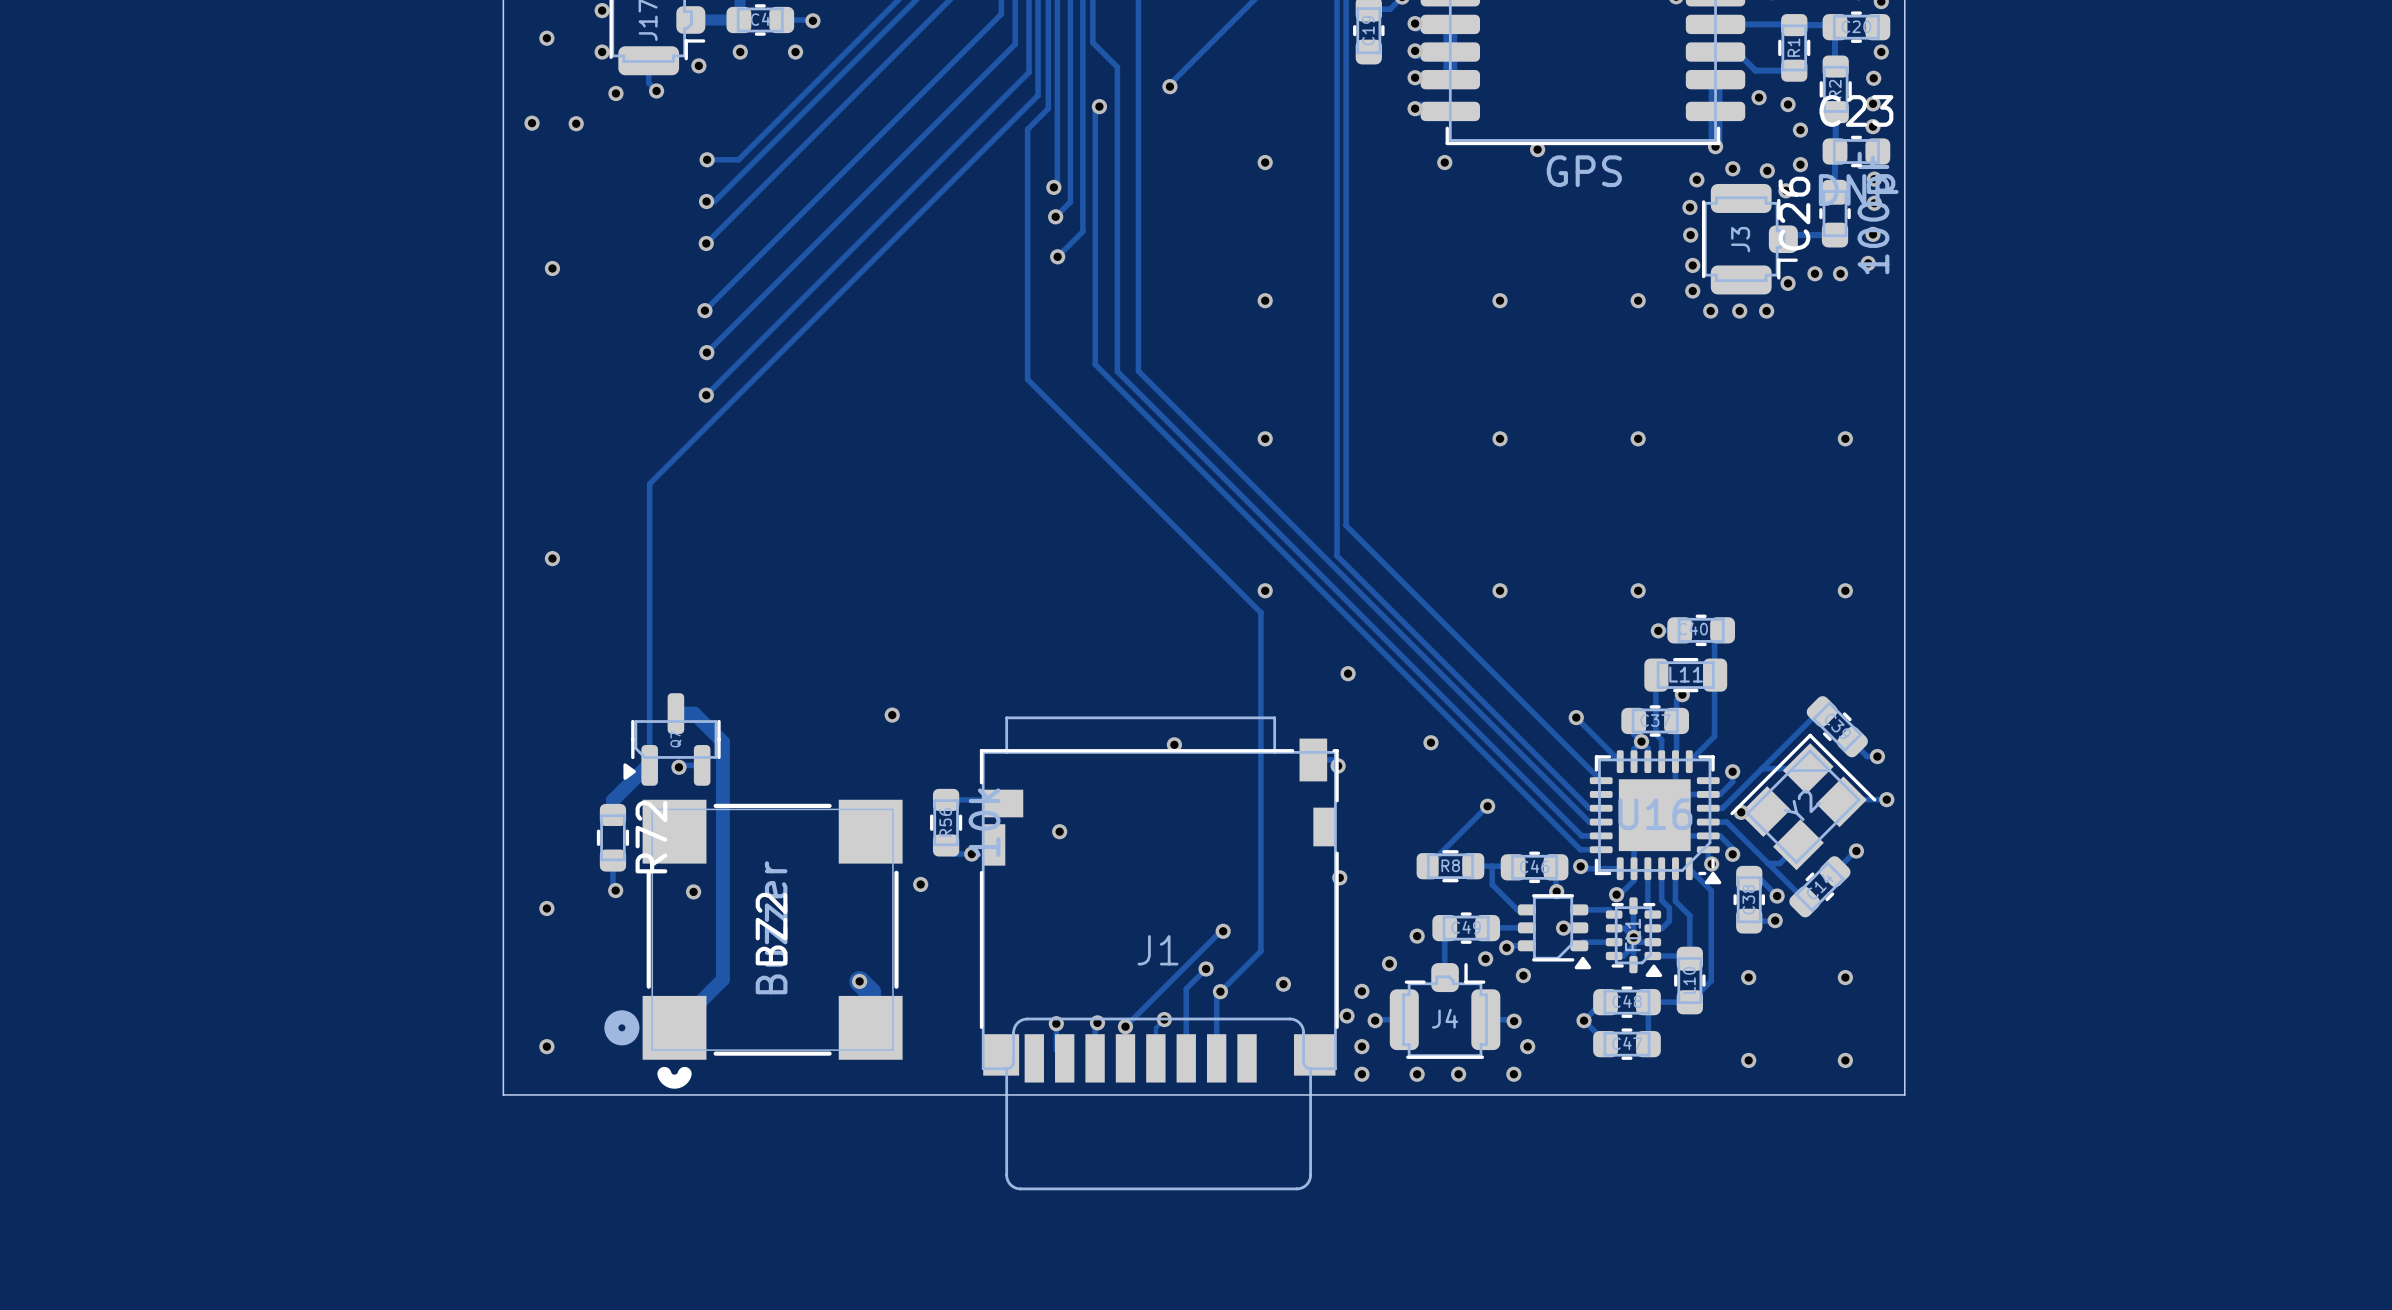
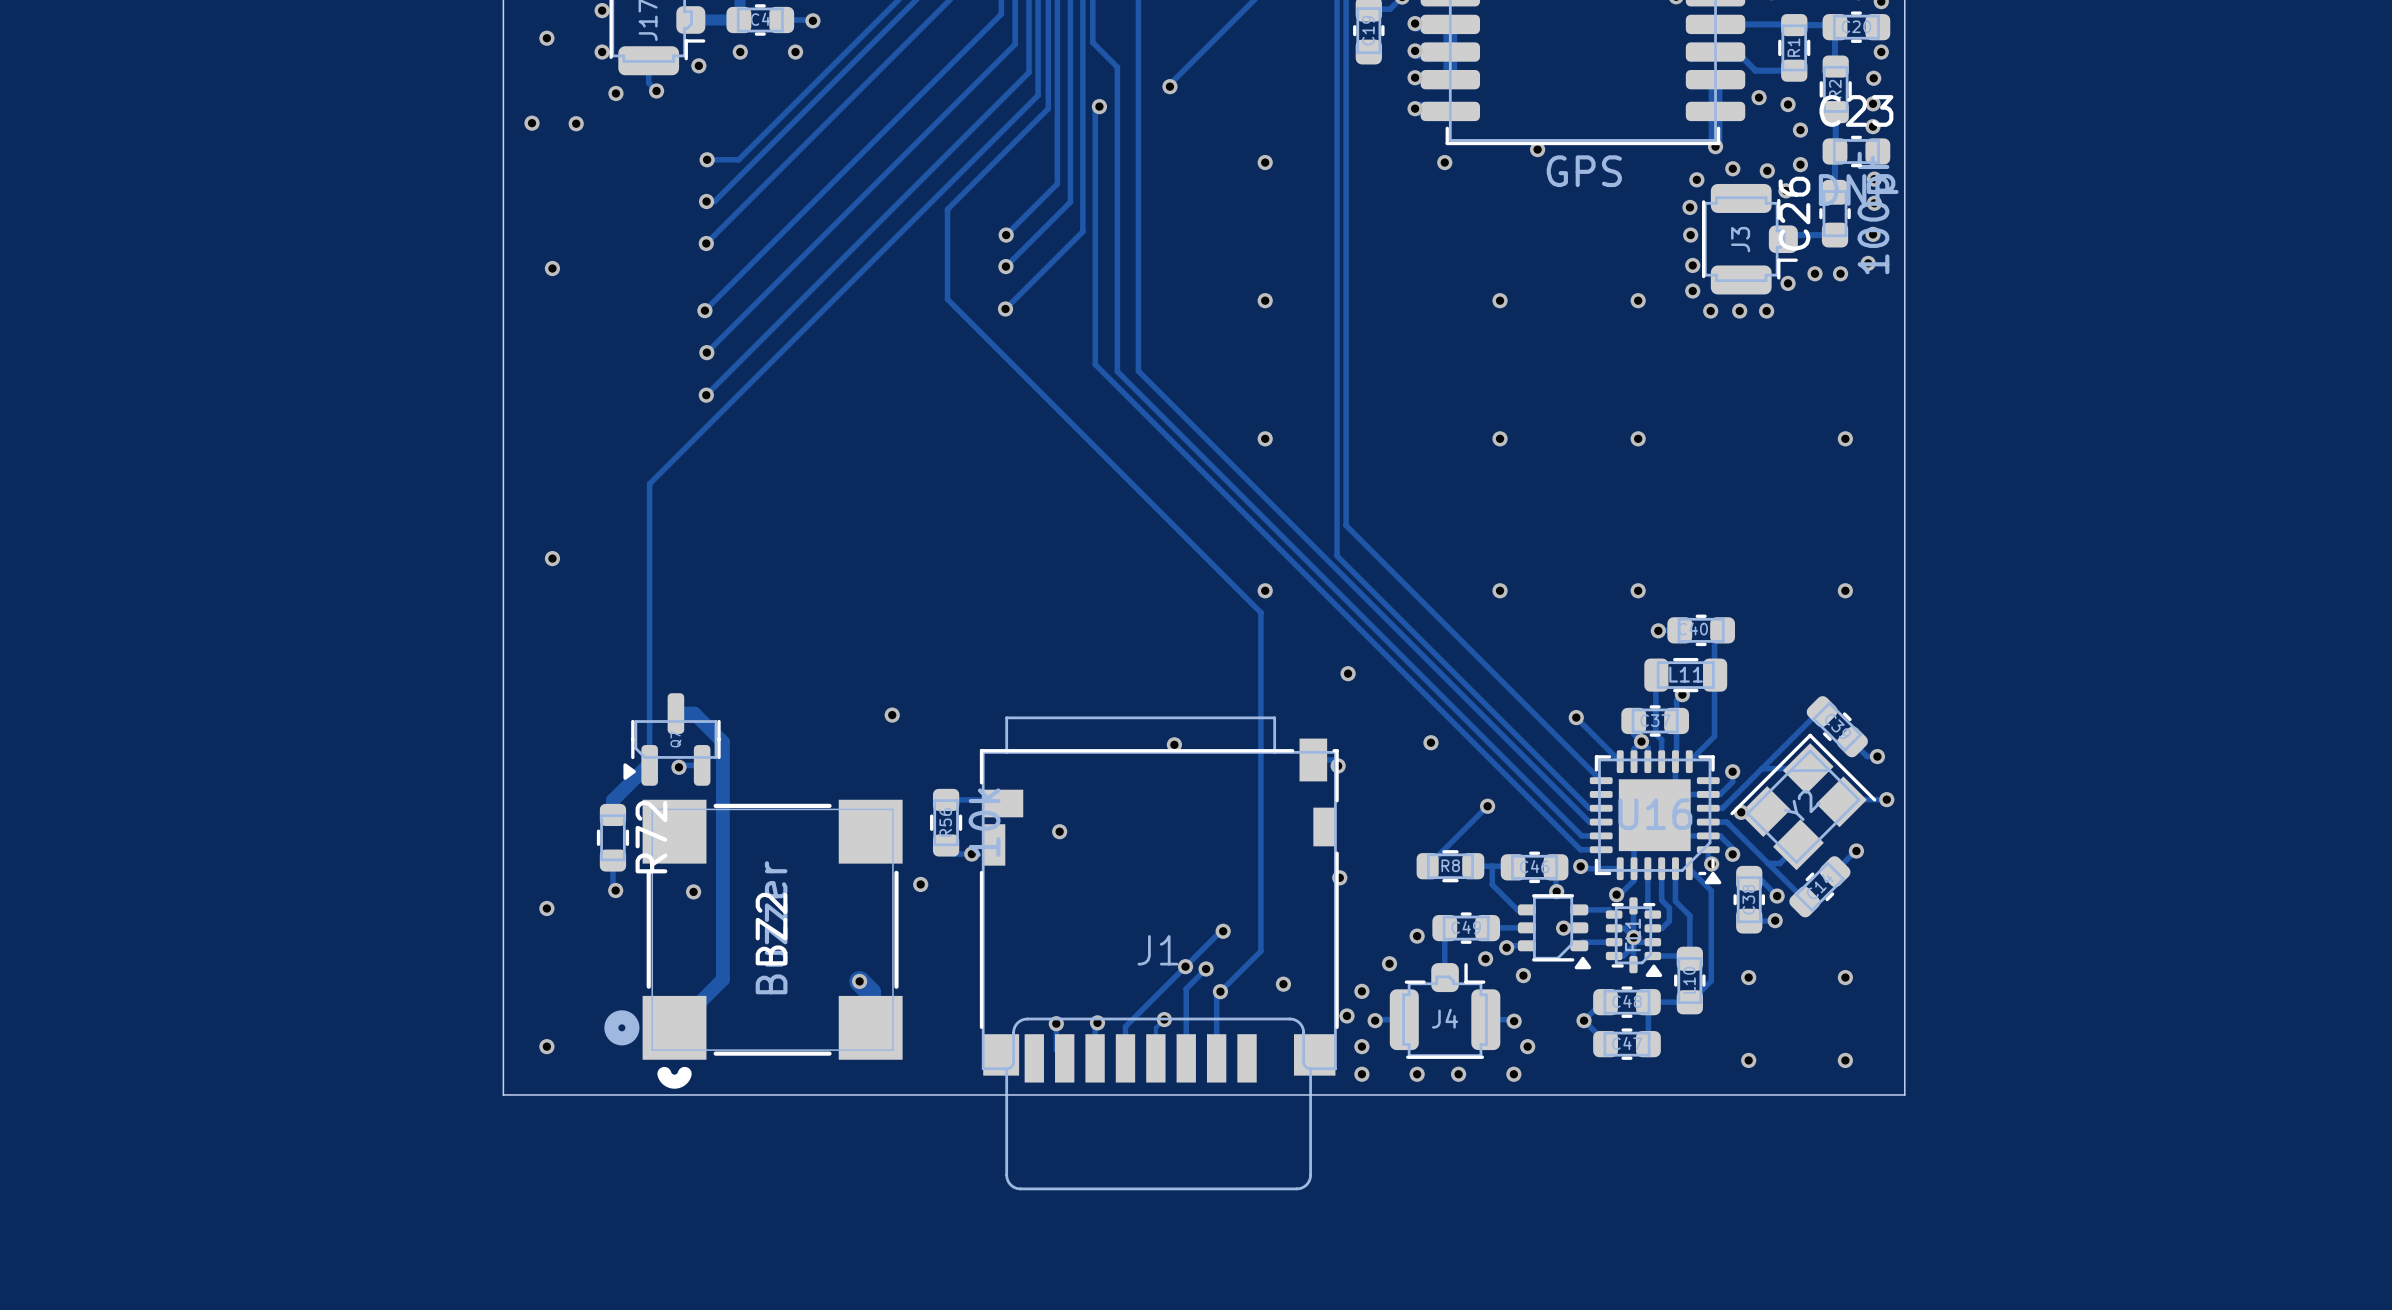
track: (1027, 129) (1027, 379) -> (1027, 129) (947, 209) (947, 299) (1027, 379)
track: none -> (1053, 187) (1006, 235)
via: (1053, 187) -> none
track: none -> (1055, 216) (1005, 266)
via: (1055, 216) -> none
via: none -> (1006, 235)
track: none -> (1057, 256) (1005, 308)
via: (1057, 256) -> none
via: none -> (1005, 266)
via: none -> (1005, 308)
via position: (1125, 1026) -> (1185, 966)

